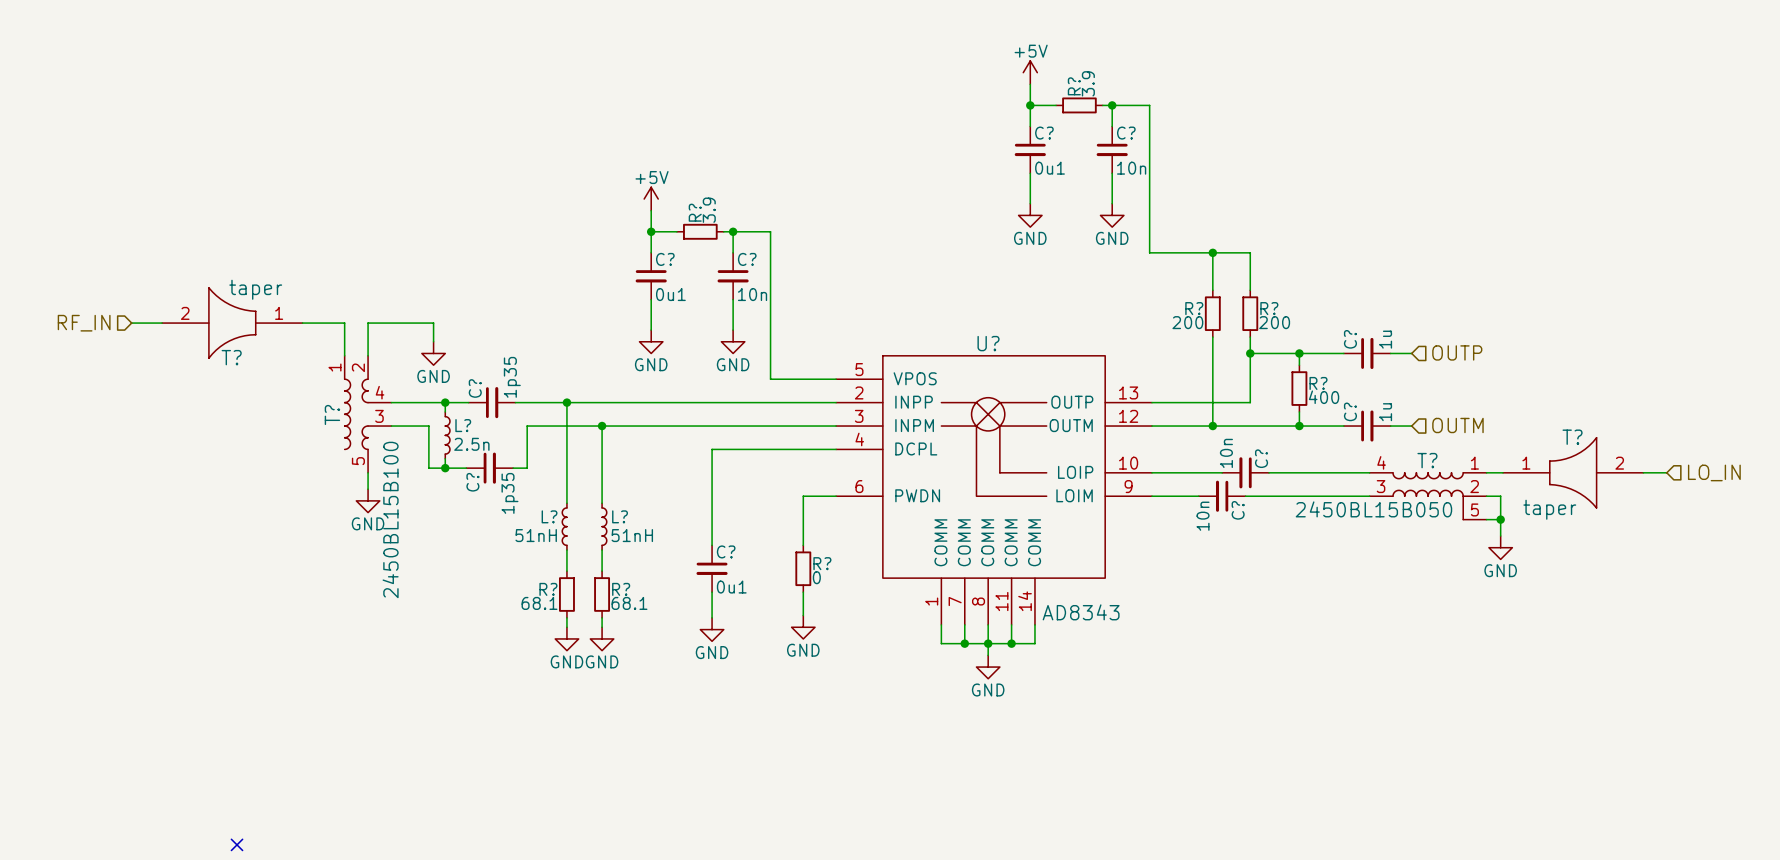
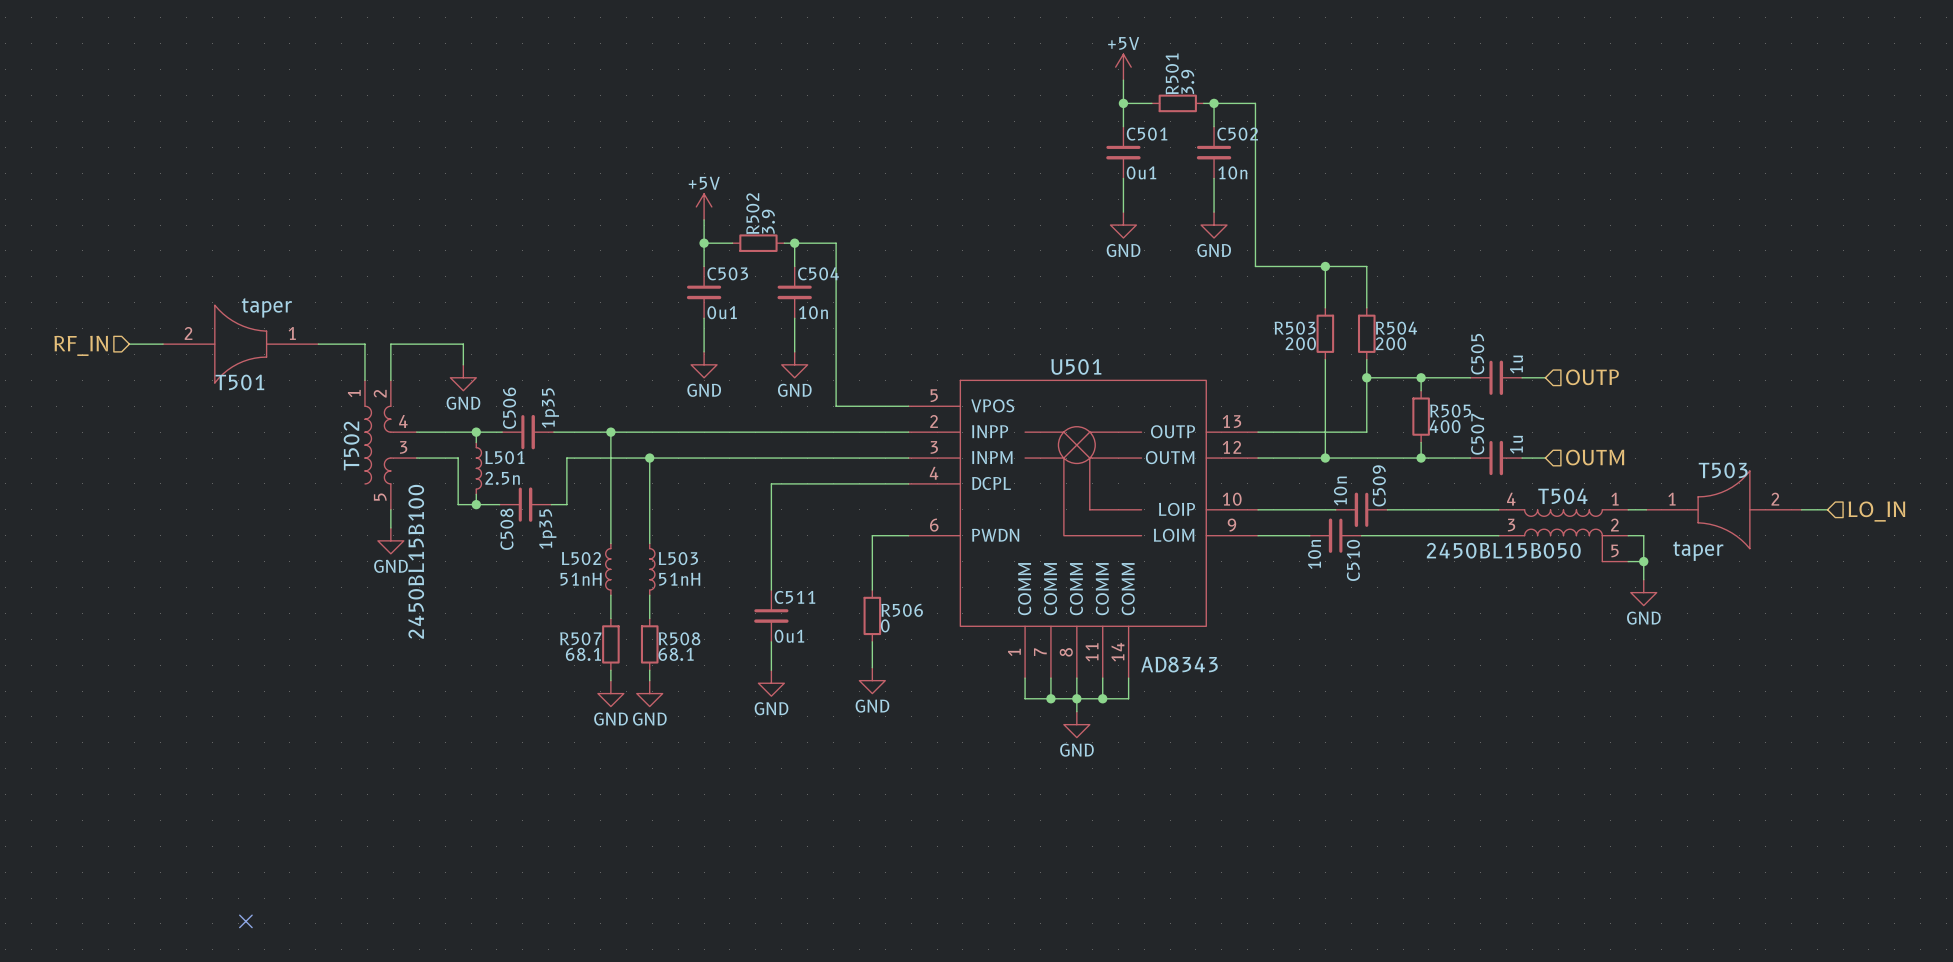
R? name: R? (1074, 86) -> R501 (1172, 73)
C? name: C? (1044, 133) -> C501 (1147, 134)
C? name: C? (1126, 133) -> C502 (1237, 134)
R? name: R? (695, 212) -> R502 (752, 213)
C? name: C? (665, 259) -> C503 (727, 273)
C? name: C? (747, 259) -> C504 (818, 273)
R? name: R? (1194, 308) -> R503 (1295, 328)
R? name: R? (1269, 308) -> R504 (1396, 328)
C? name: C? (1350, 339) -> C505 (1477, 354)
U? name: U? (988, 343) -> U501 (1076, 366)
T? name: T? (231, 357) -> T501 (239, 382)
R? name: R? (1318, 383) -> R505 (1450, 411)
C? name: C? (475, 388) -> C506 (509, 408)
C? name: C? (1350, 411) -> C507 (1477, 434)
T? name: T? (332, 414) -> T502 (351, 445)
L? name: L? (463, 425) -> L501 (504, 457)
T? name: T? (1572, 437) -> T503 (1723, 470)
C? name: C? (1261, 458) -> C509 (1379, 485)
T? name: T? (1427, 460) -> T504 (1562, 496)
C? name: C? (472, 482) -> C508 (506, 529)
C? name: C? (1238, 510) -> C510 (1353, 560)
L? name: L? (549, 516) -> L502 (581, 558)
L? name: L? (620, 516) -> L503 (678, 558)
C? name: C? (726, 551) -> C511 (795, 597)
R? name: R? (822, 563) -> R506 (902, 610)
R? name: R? (548, 589) -> R507 (580, 638)
R? name: R? (621, 589) -> R508 (679, 638)

